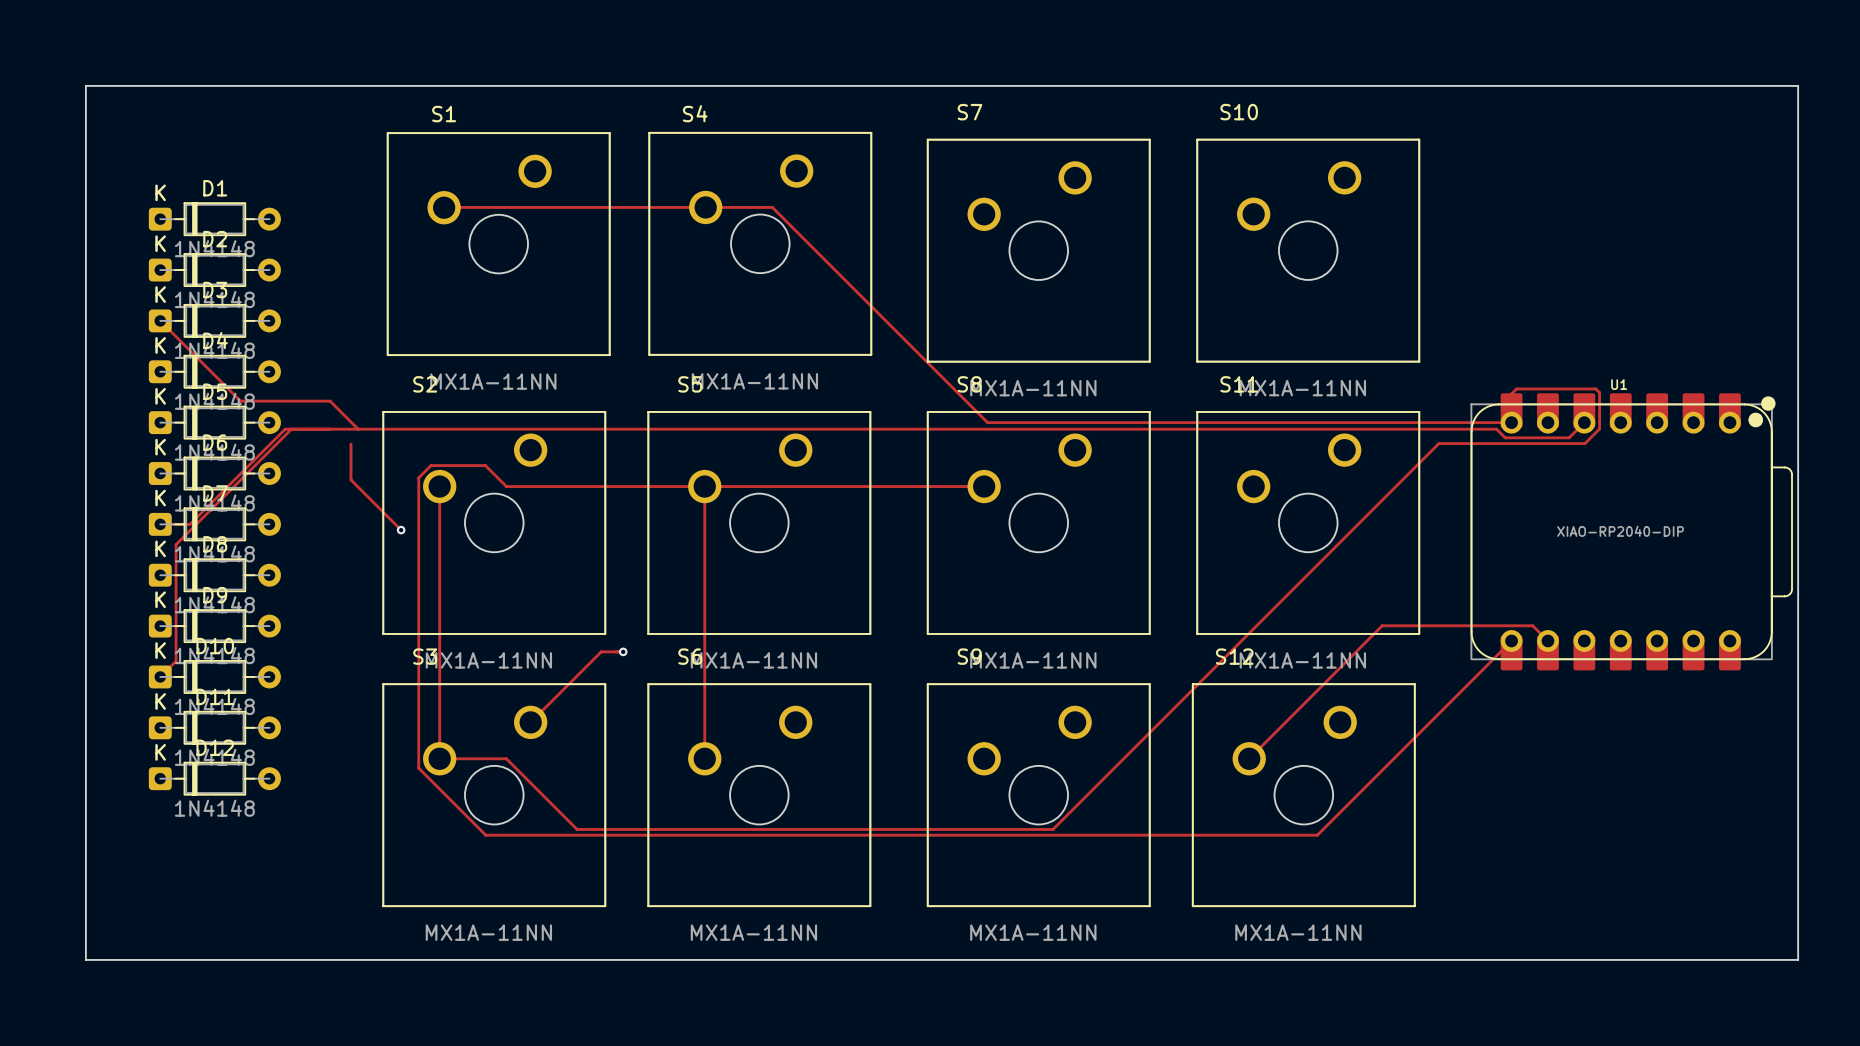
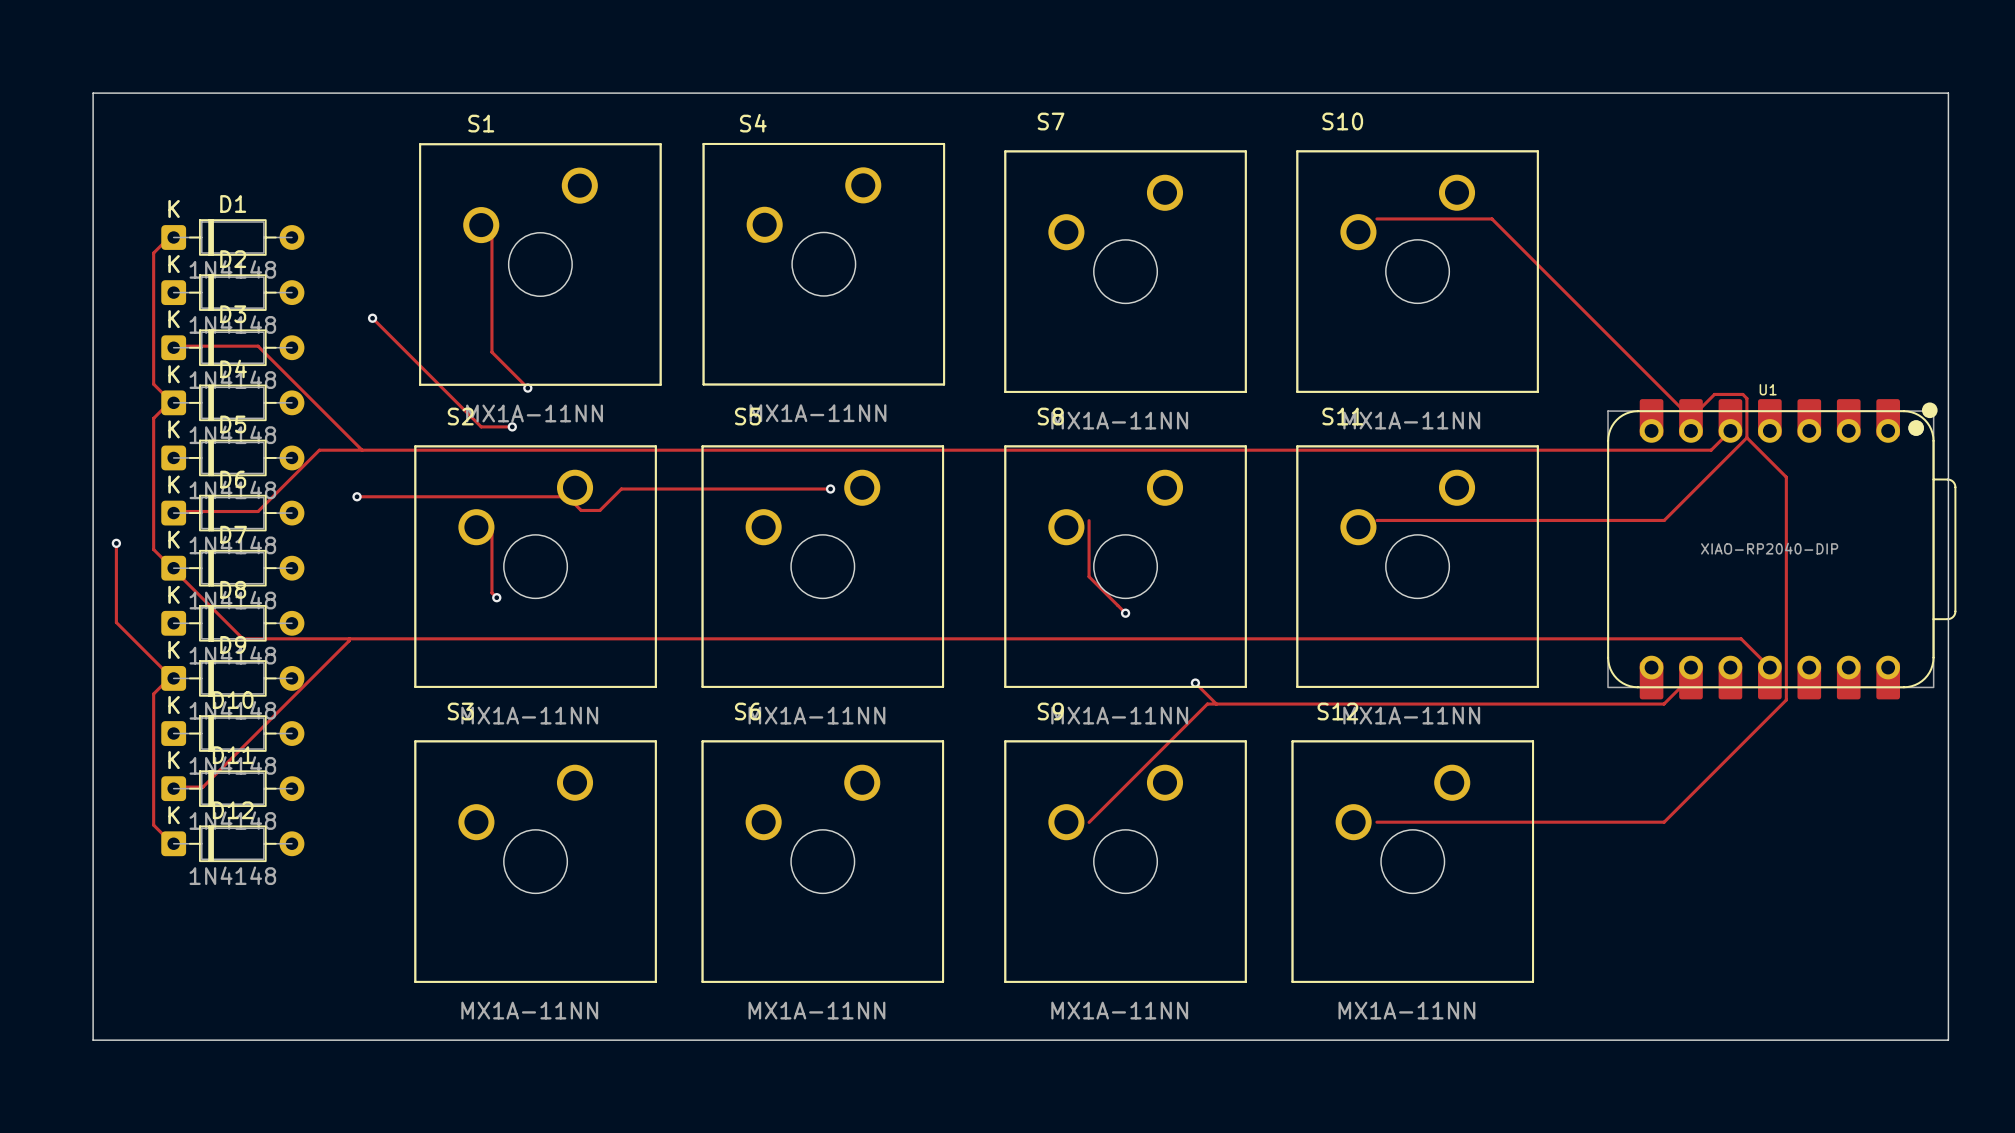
track: none -> (1376, 218) (1491, 218) (1690, 417) (1714, 394) (1742, 394) (1746, 398) (1746, 437)
track: (444, 207) (772, 207) (987, 422) (1511, 422) (1511, 393) (1516, 388) (1595, 388) (1599, 392) (1599, 428) (1584, 443) (1438, 443) (1052, 829) (577, 829) (506, 758) (439, 758) (439, 486) -> none
track: none -> (491, 225) (491, 352) (527, 388)
track: none -> (170, 235) (153, 253) (153, 384) (170, 401) (153, 418) (153, 549) (242, 638) (1741, 638) (1769, 667)
track: none -> (372, 318) (481, 426) (512, 426)
via: none -> (372, 318)
track: none -> (170, 346) (258, 346) (362, 450)
track: (160, 320) (240, 401) (330, 401) (358, 429) -> none
via: none -> (527, 388)
via: none -> (512, 426)
track: none -> (1730, 430) (1711, 450) (319, 450) (258, 511) (170, 511)
track: none -> (1746, 437) (1664, 520) (1376, 520)
track: none -> (1746, 437) (1786, 477) (1786, 700) (1664, 822) (1376, 822)
track: (1584, 422) (1569, 437) (1505, 437) (1496, 429) (285, 429) (190, 524) (160, 524) -> none
track: (291, 429) (176, 544) (176, 661) (160, 676) -> none
track: (350, 444) (350, 479) (401, 530) -> none
track: none -> (830, 489) (621, 489) (599, 510) (581, 510) (567, 496) (357, 496)
via: none -> (830, 489)
via: none -> (357, 496)
track: none -> (1089, 520) (1089, 576) (1125, 613)
track: none -> (491, 527) (491, 592) (496, 597)
track: (704, 486) (704, 758) -> none
track: (984, 486) (506, 486) (485, 465) (431, 465) (418, 477) (418, 768) (485, 835) (1317, 835) (1511, 641) -> none
track: none -> (116, 543) (116, 622) (170, 676) (153, 693) (153, 825) (170, 842)
via: none -> (116, 543)
via: (401, 530) -> none
U1 position: (1631, 531) -> (1781, 549)
via: none -> (496, 597)
via: none -> (1125, 613)
track: none -> (349, 638) (202, 787) (170, 787)
track: none -> (1690, 667) (1690, 677) (1663, 704) (1207, 704) (1089, 822)
track: none -> (1195, 683) (1216, 704)
via: none -> (1195, 683)
track: (1547, 641) (1532, 625) (1382, 625) (1249, 758) -> none
track: (623, 651) (601, 651) (530, 722) -> none
via: (623, 651) -> none

